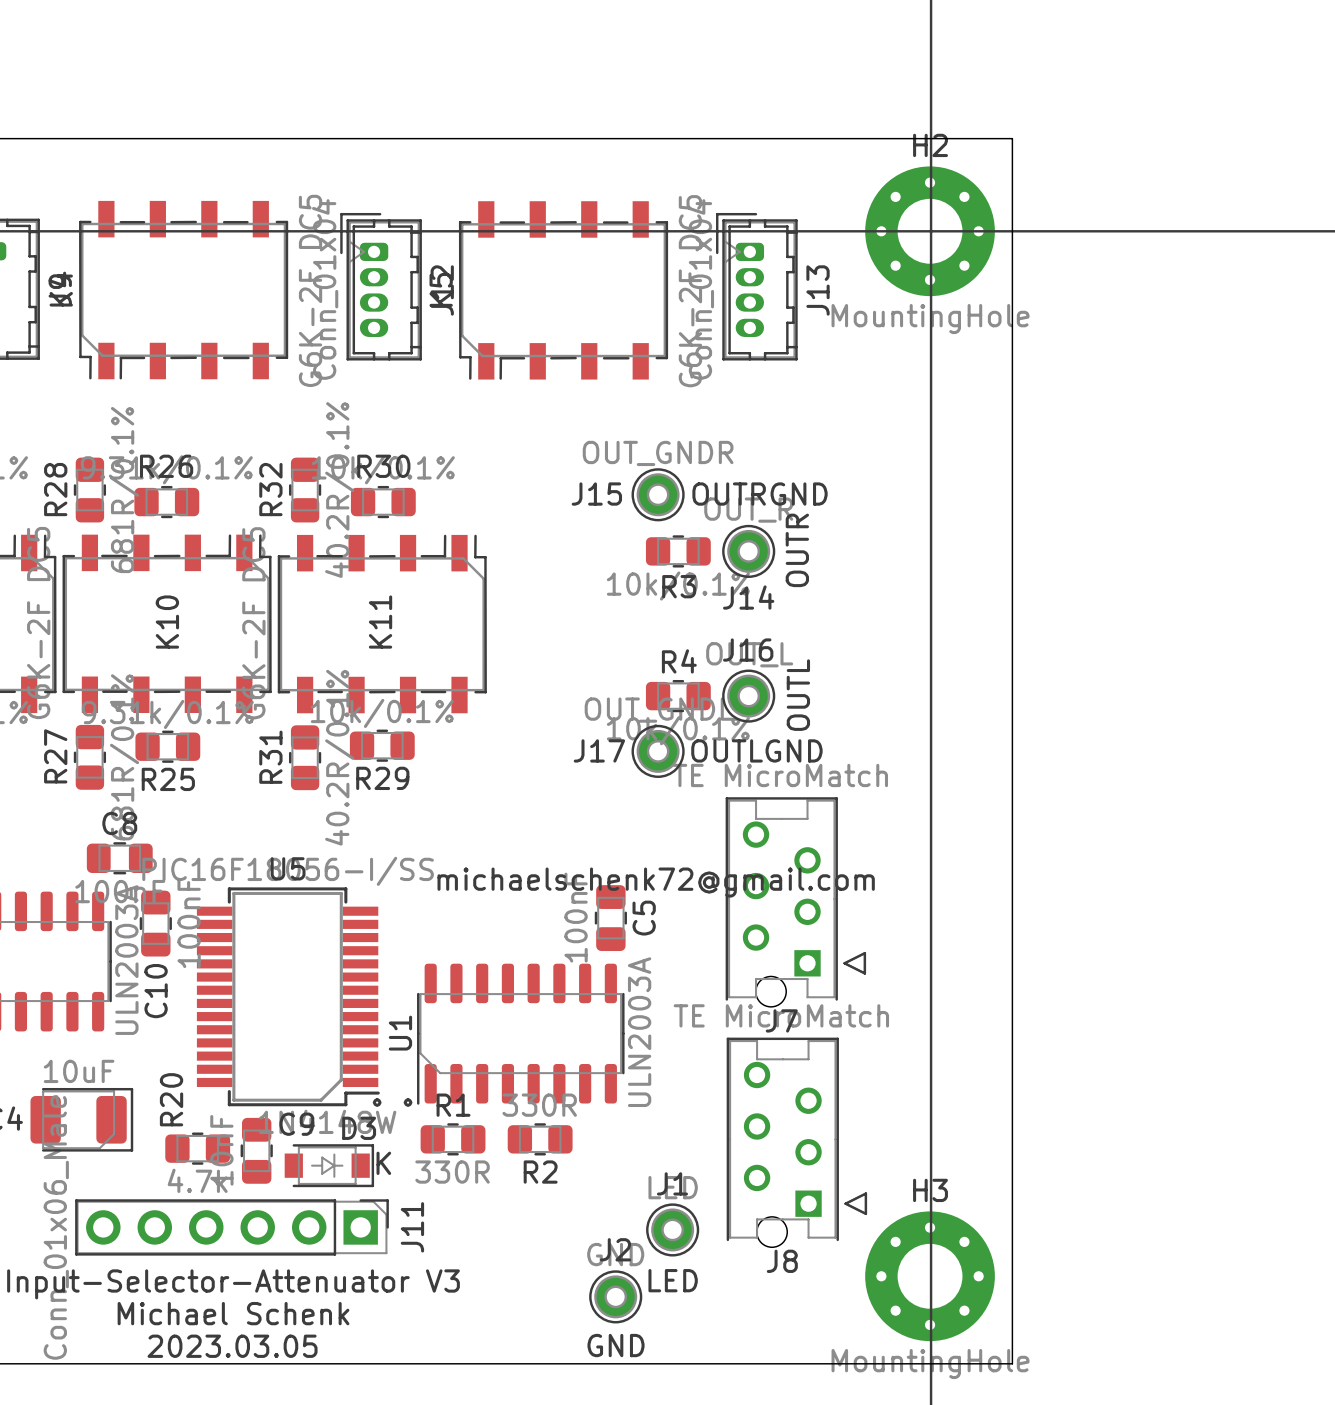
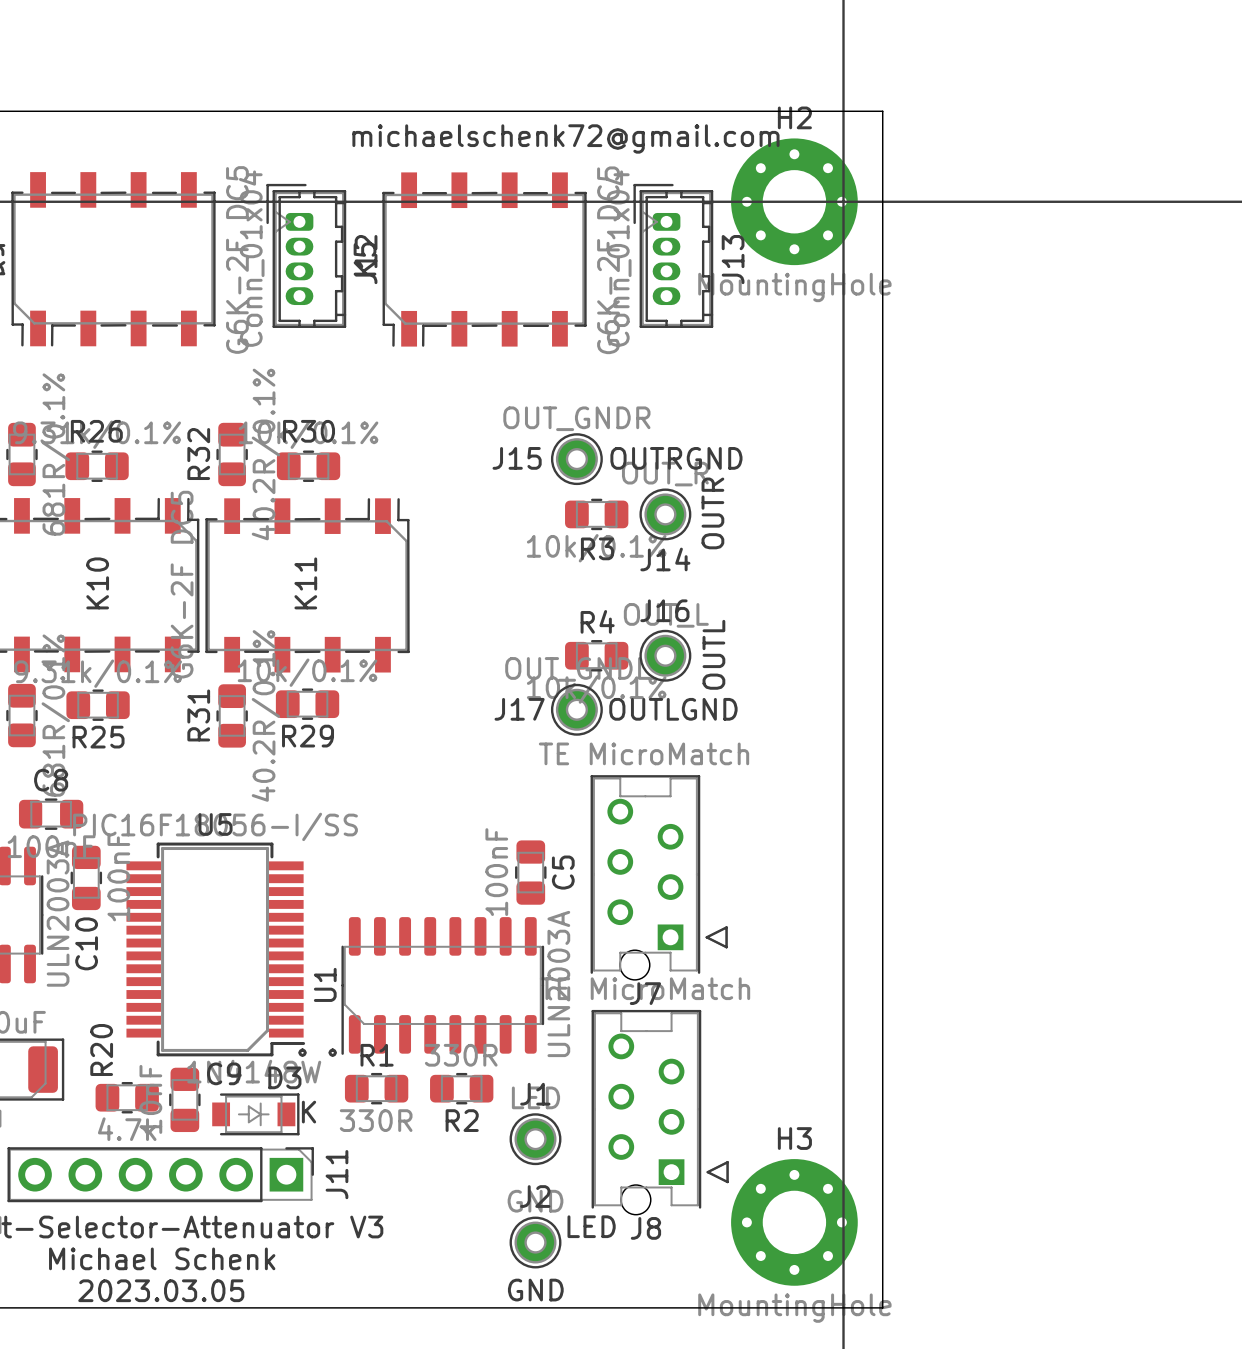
board edge: (971, 138) (1012, 138) (1012, 1363) (971, 1363) -> (882, 111) (882, 1307)
text: none -> michaelschenk72@gmail.com (565, 138)
H2 position: (930, 231) -> (794, 201)
text: michaelschenk72@gmail.com (656, 882) -> none
J7 position: (795, 902) -> (659, 877)
J8 position: (796, 1142) -> (660, 1112)
J1 position: (672, 1229) -> (535, 1139)
H3 position: (930, 1276) -> (794, 1222)

